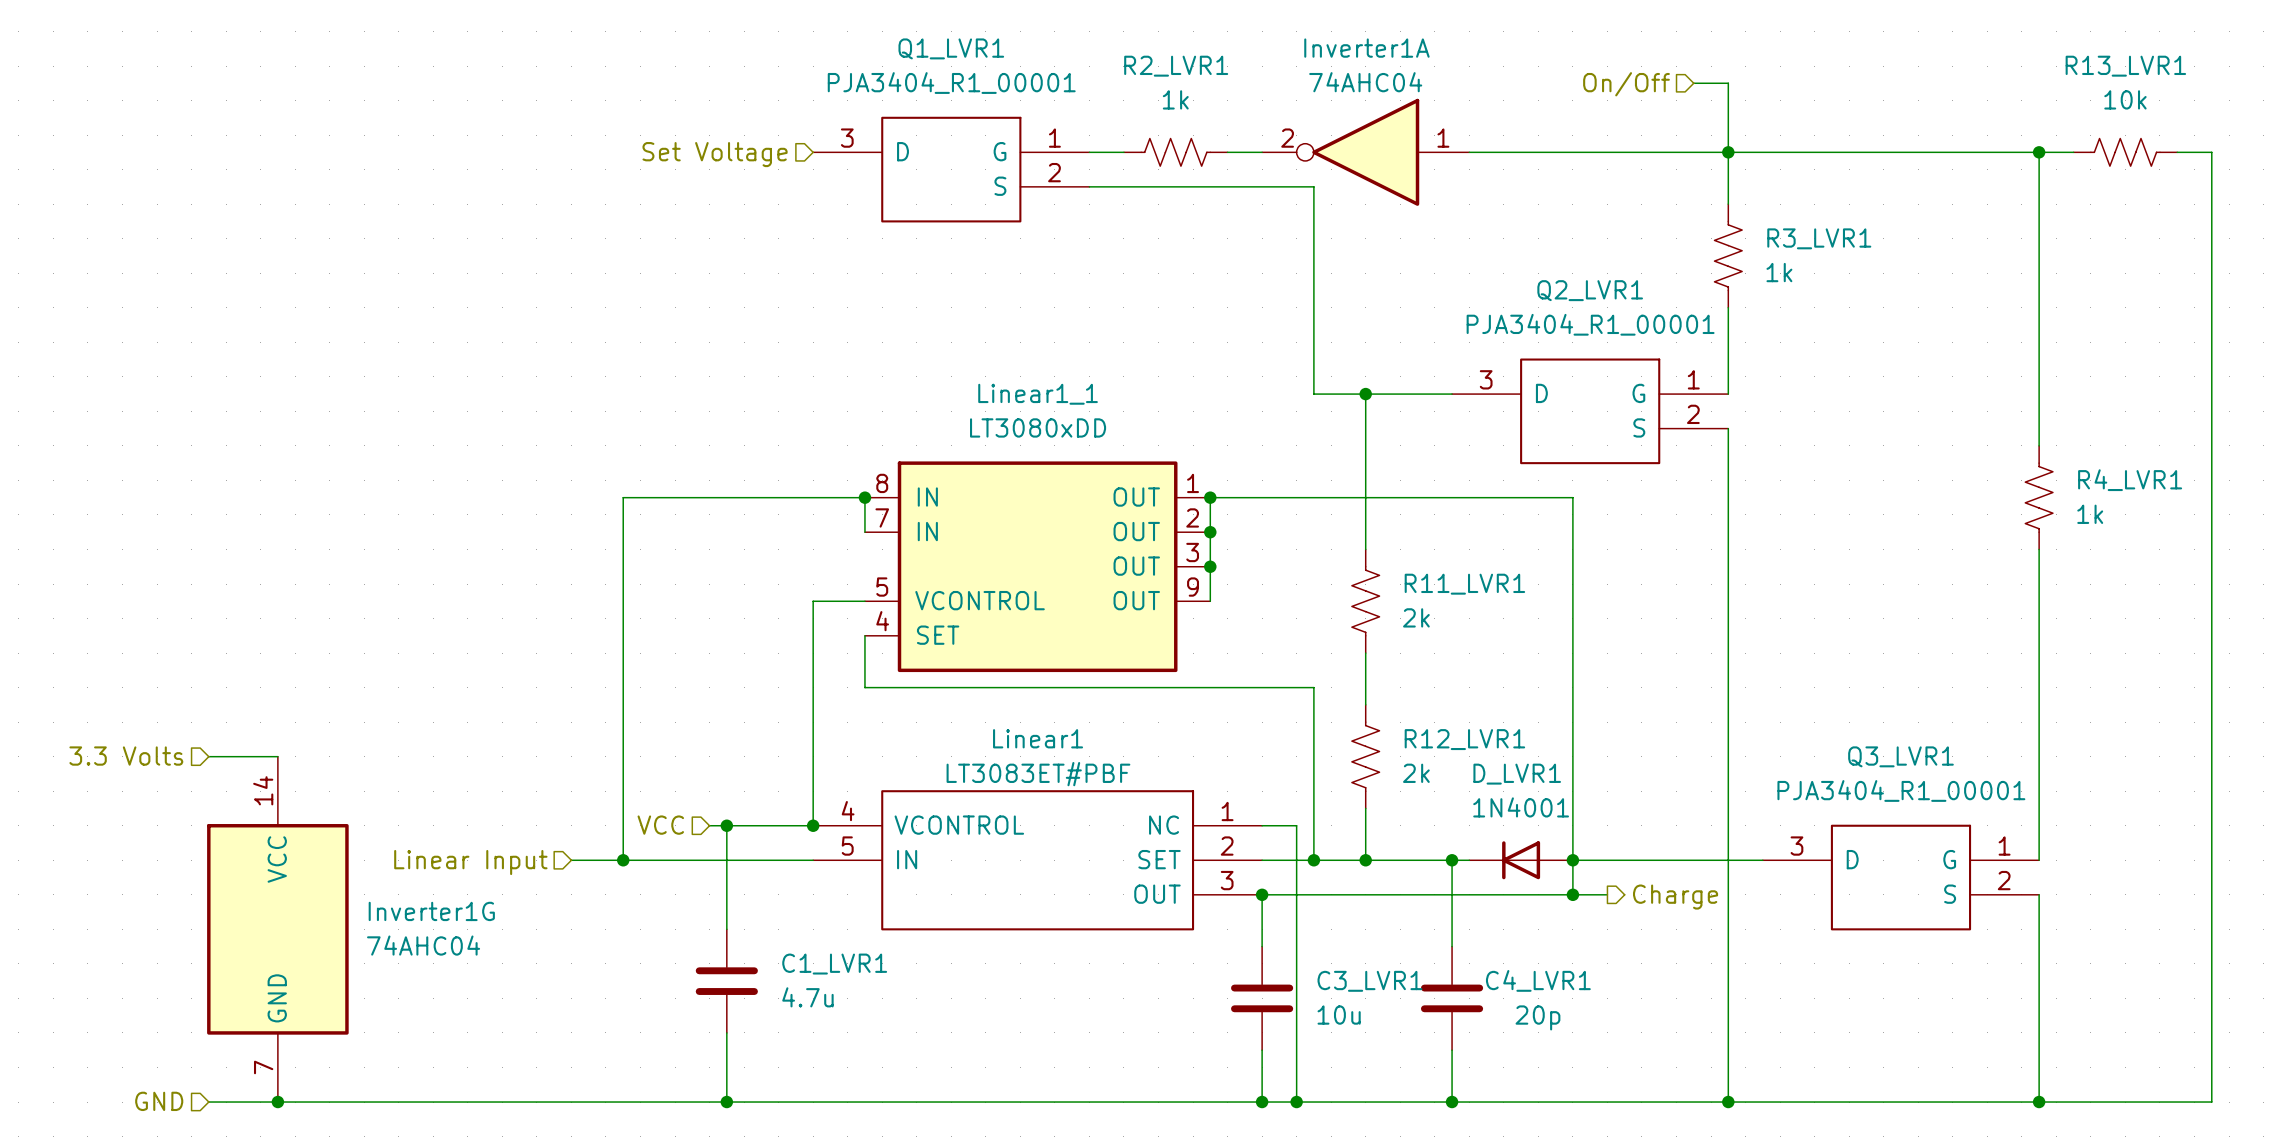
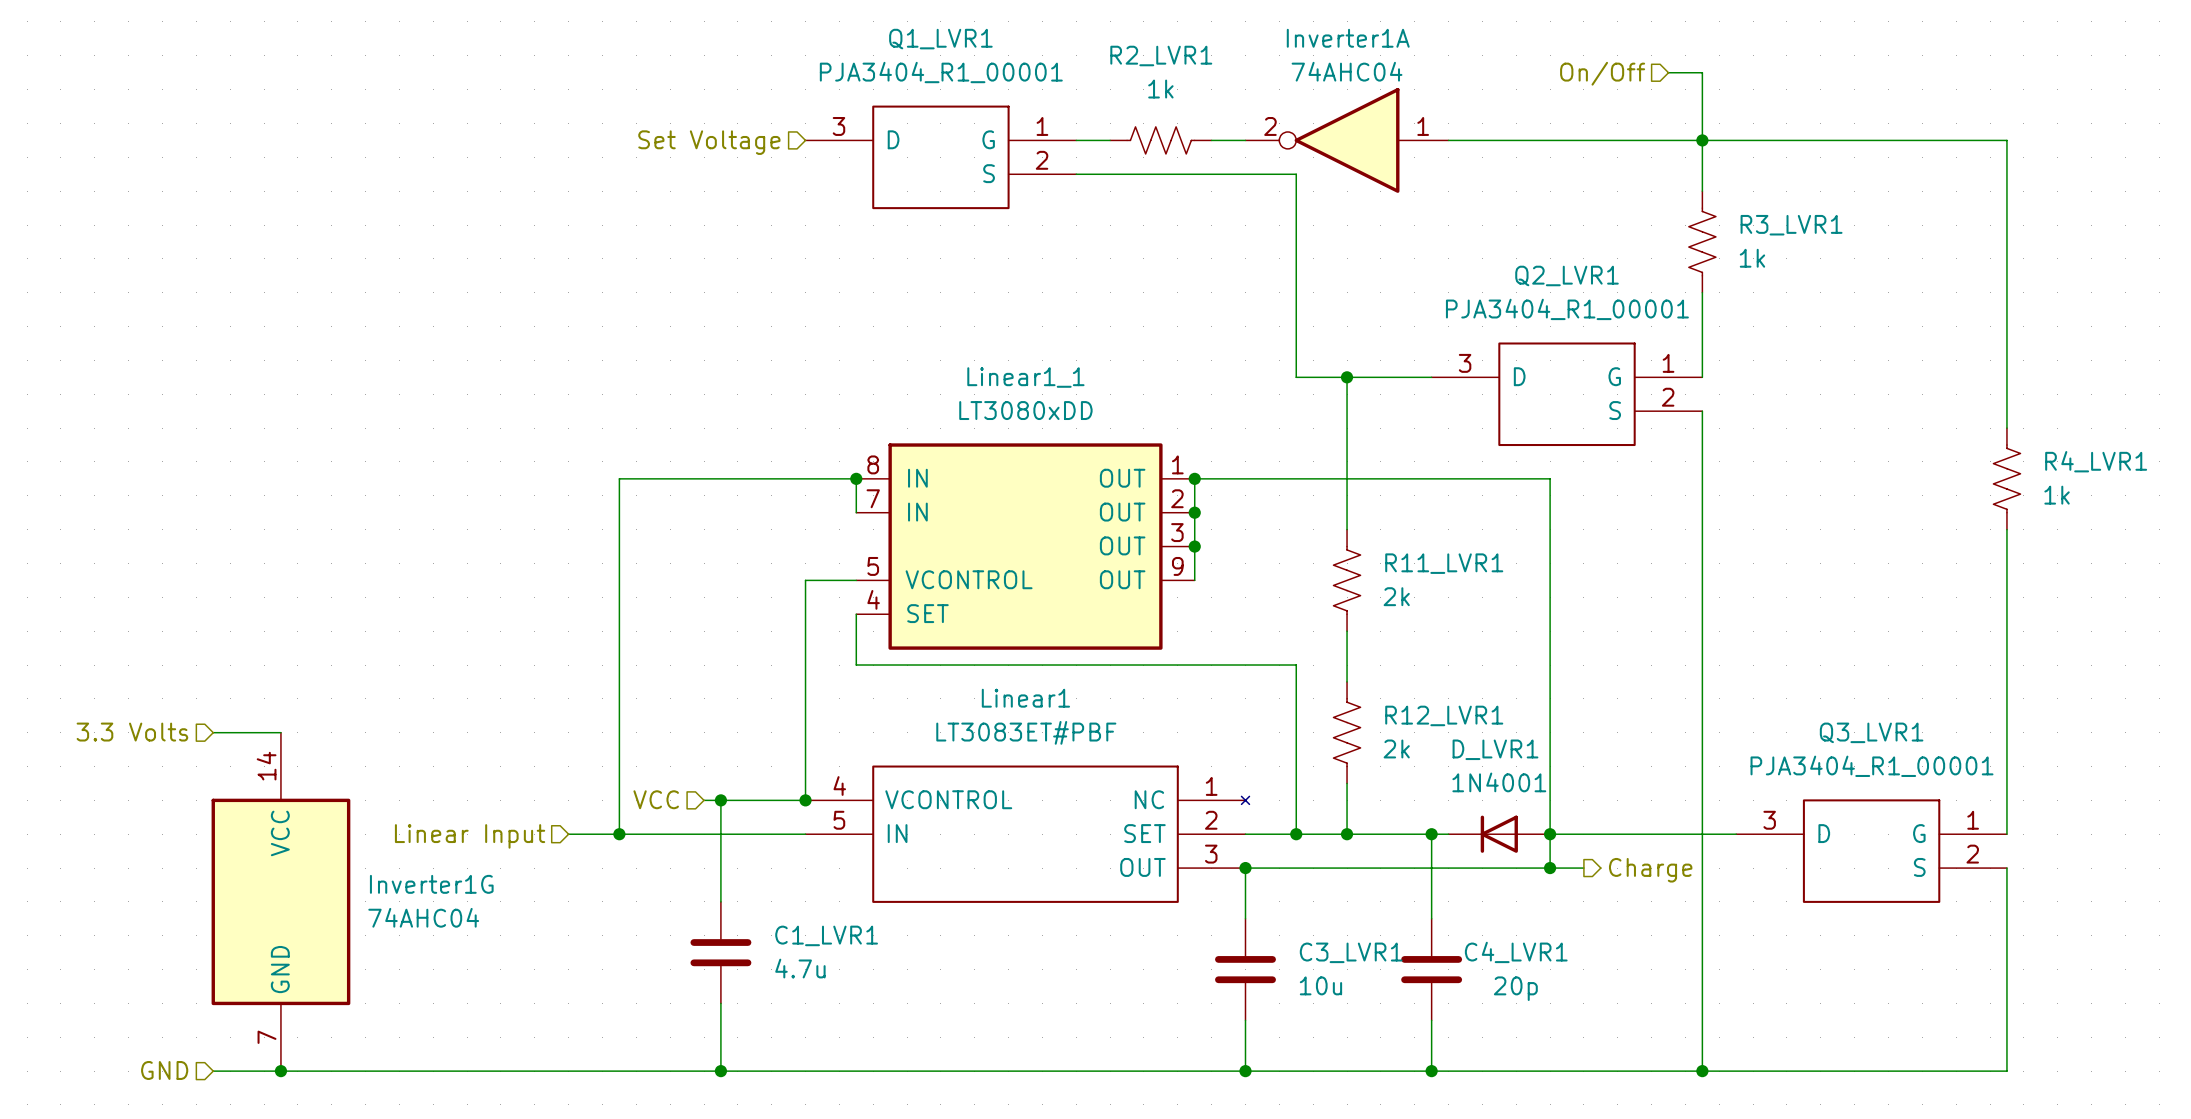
wire: (2039, 152) (2073, 152) -> none
junction: (2039, 152) -> none
R13_LVR1: 10k (2125, 152) -> none
wire: (2177, 152) (2211, 152) (2211, 1102) (2039, 1102) -> none
Linear1 symbol: [813, 790, 1263, 931] -> [805, 765, 1250, 903]
wire: (1262, 825) (1296, 825) (1296, 1102) -> none
junction: (1296, 1102) -> none
junction: (2039, 1102) -> none

